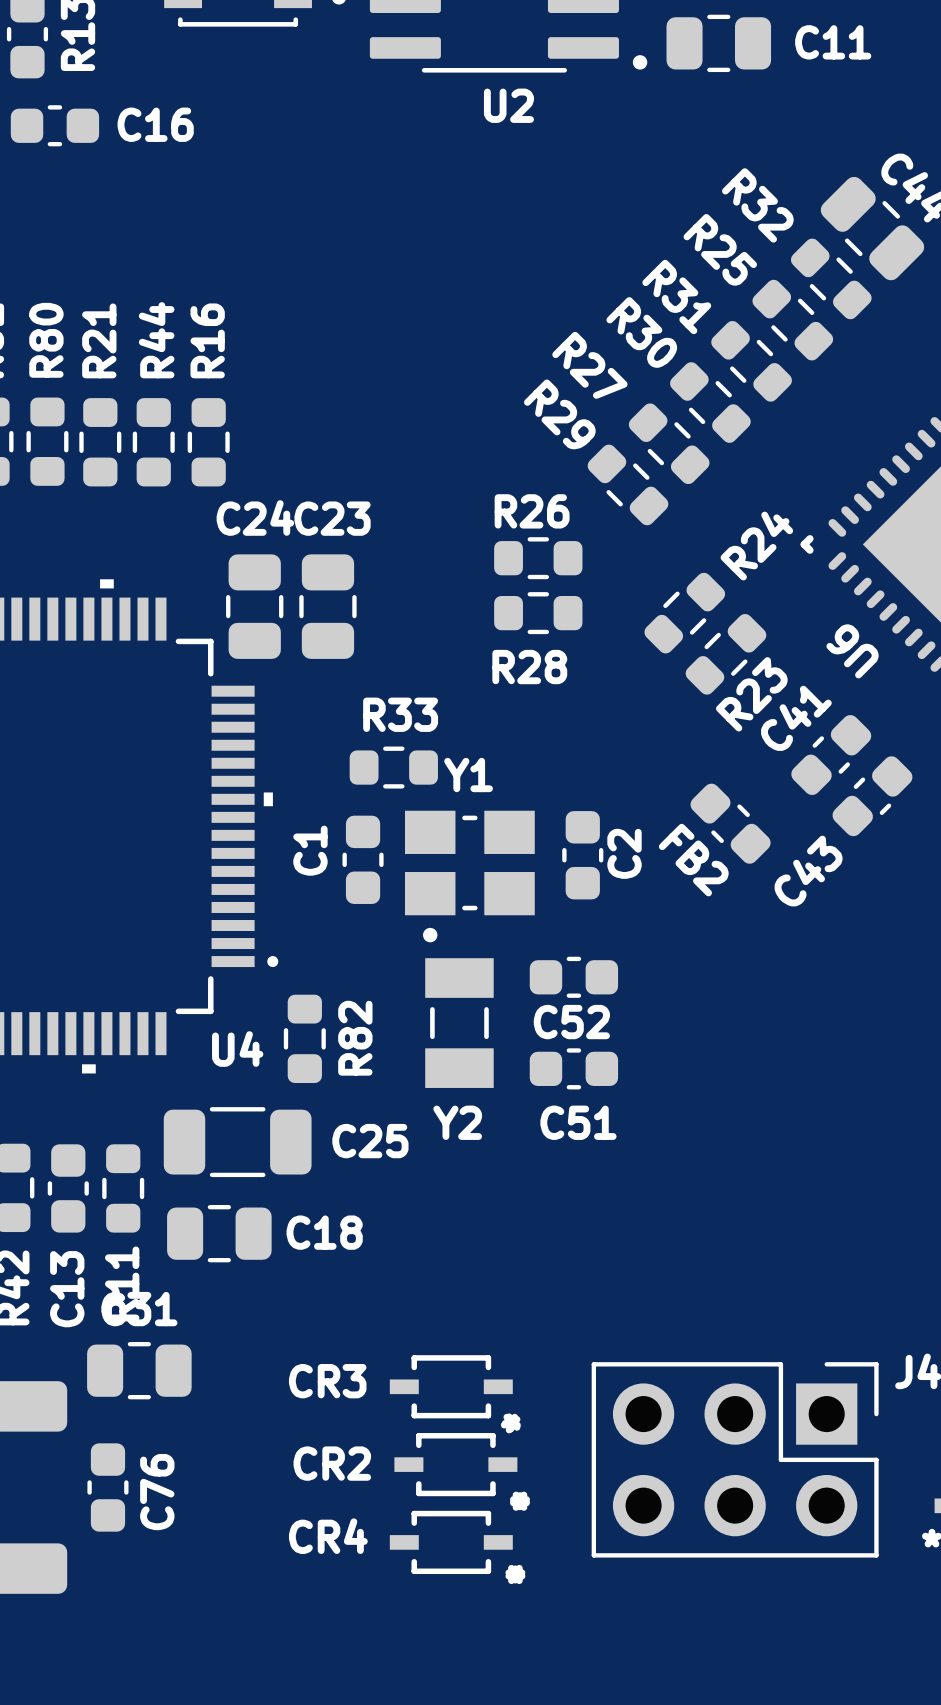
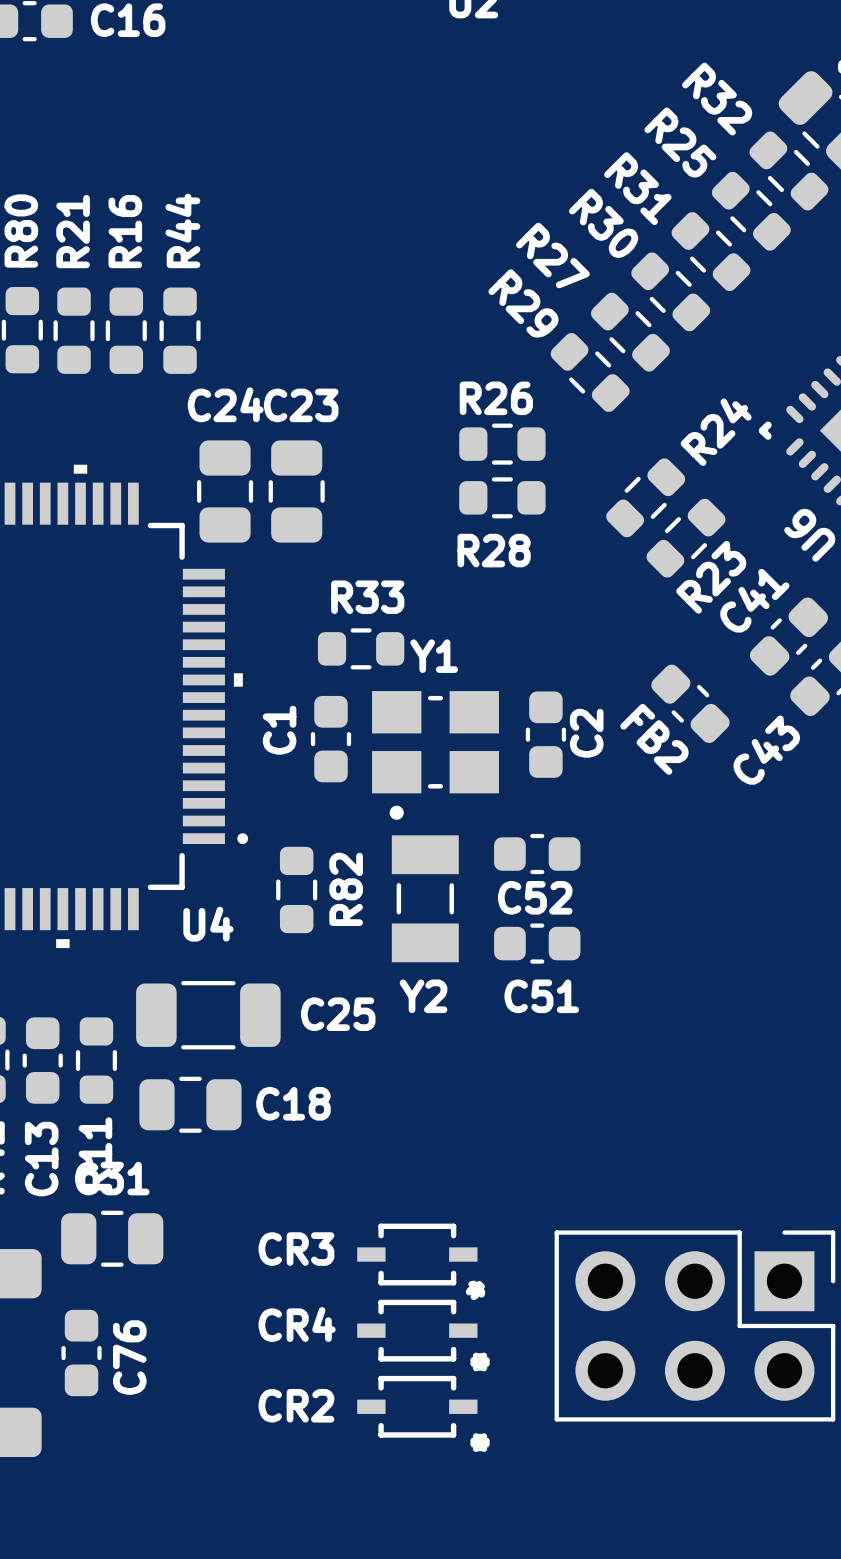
R44 name: R44 (156, 340) -> R16 (125, 231)
R16 name: R16 (207, 340) -> R44 (182, 230)
R82 position: (304, 1038) -> (296, 889)
CR2 position: (455, 1464) -> (417, 1406)
CR4 position: (451, 1542) -> (417, 1330)

